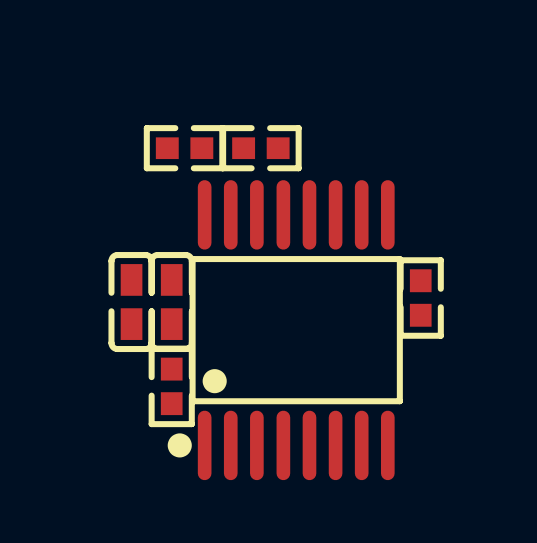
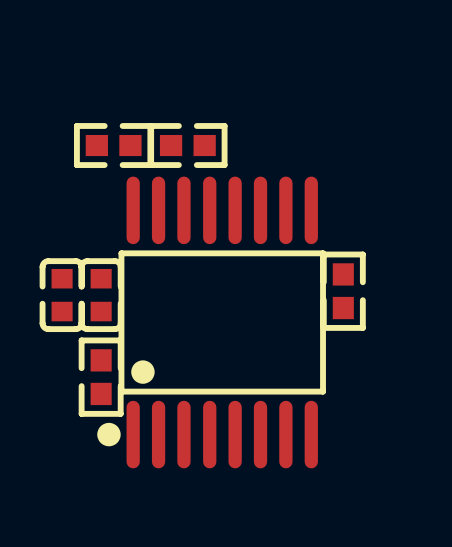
part footprint: [108, 252, 155, 353] -> [39, 258, 85, 333]
part footprint: [148, 252, 195, 353] -> [78, 258, 124, 333]

